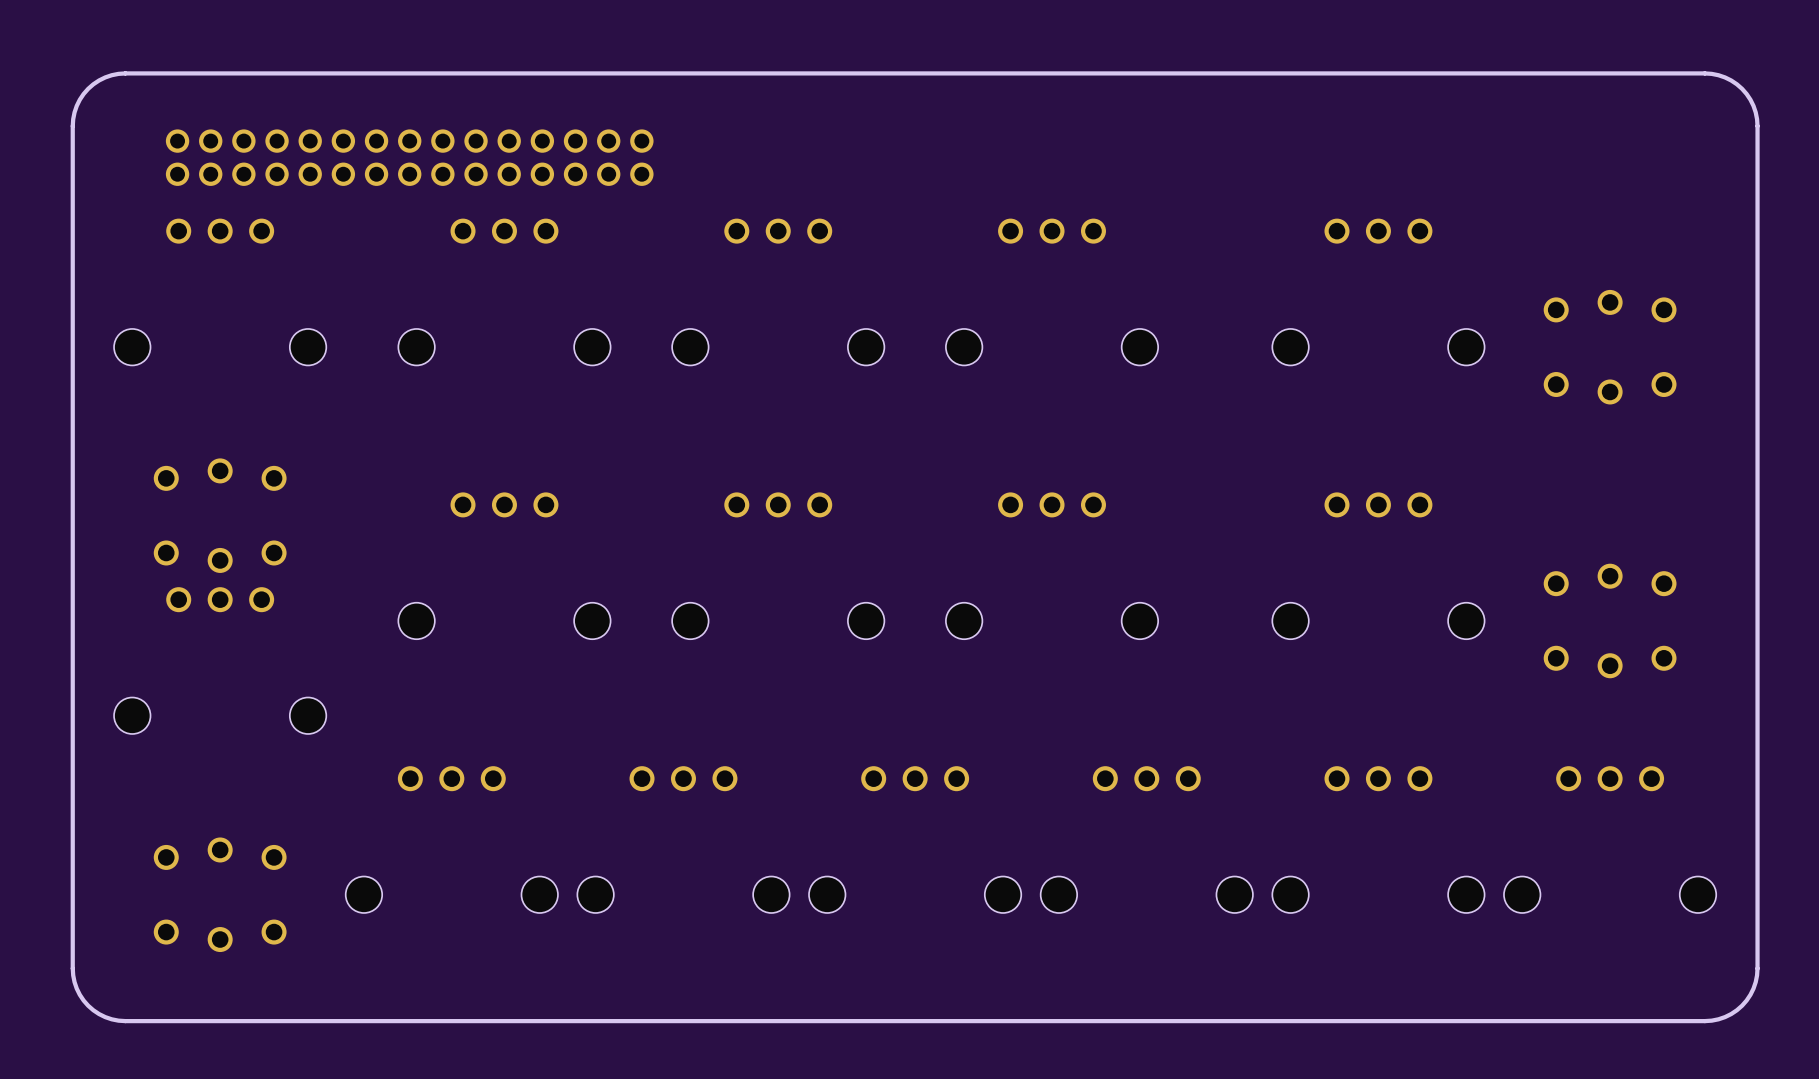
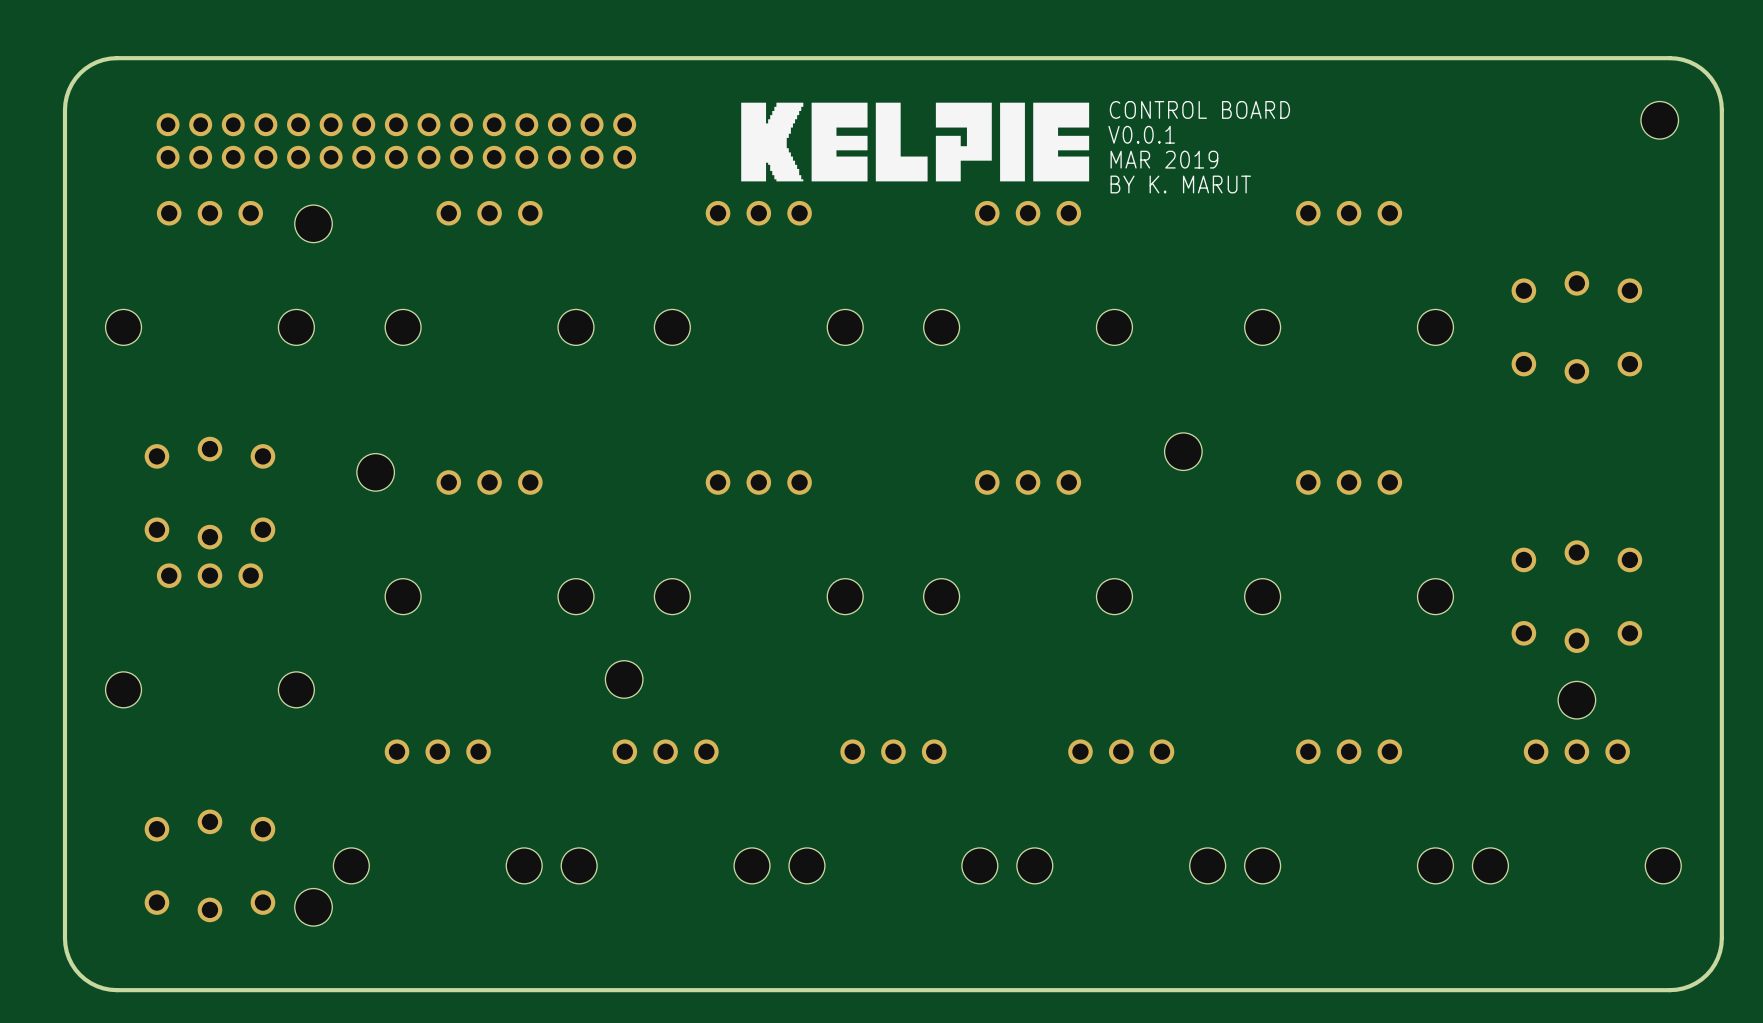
drawing: none -> [741, 102, 1090, 182]
text: none -> CONTROL BOARD (1199, 109)
hole: none -> (1659, 120)
text: none -> V0.0.1 (1141, 134)
text: none -> MAR 2019 (1164, 159)
text: none -> BY K. MARUT (1180, 184)
hole: none -> (313, 223)
hole: none -> (1183, 451)
hole: none -> (375, 472)
hole: none -> (624, 679)
hole: none -> (1576, 700)
hole: none -> (313, 907)

